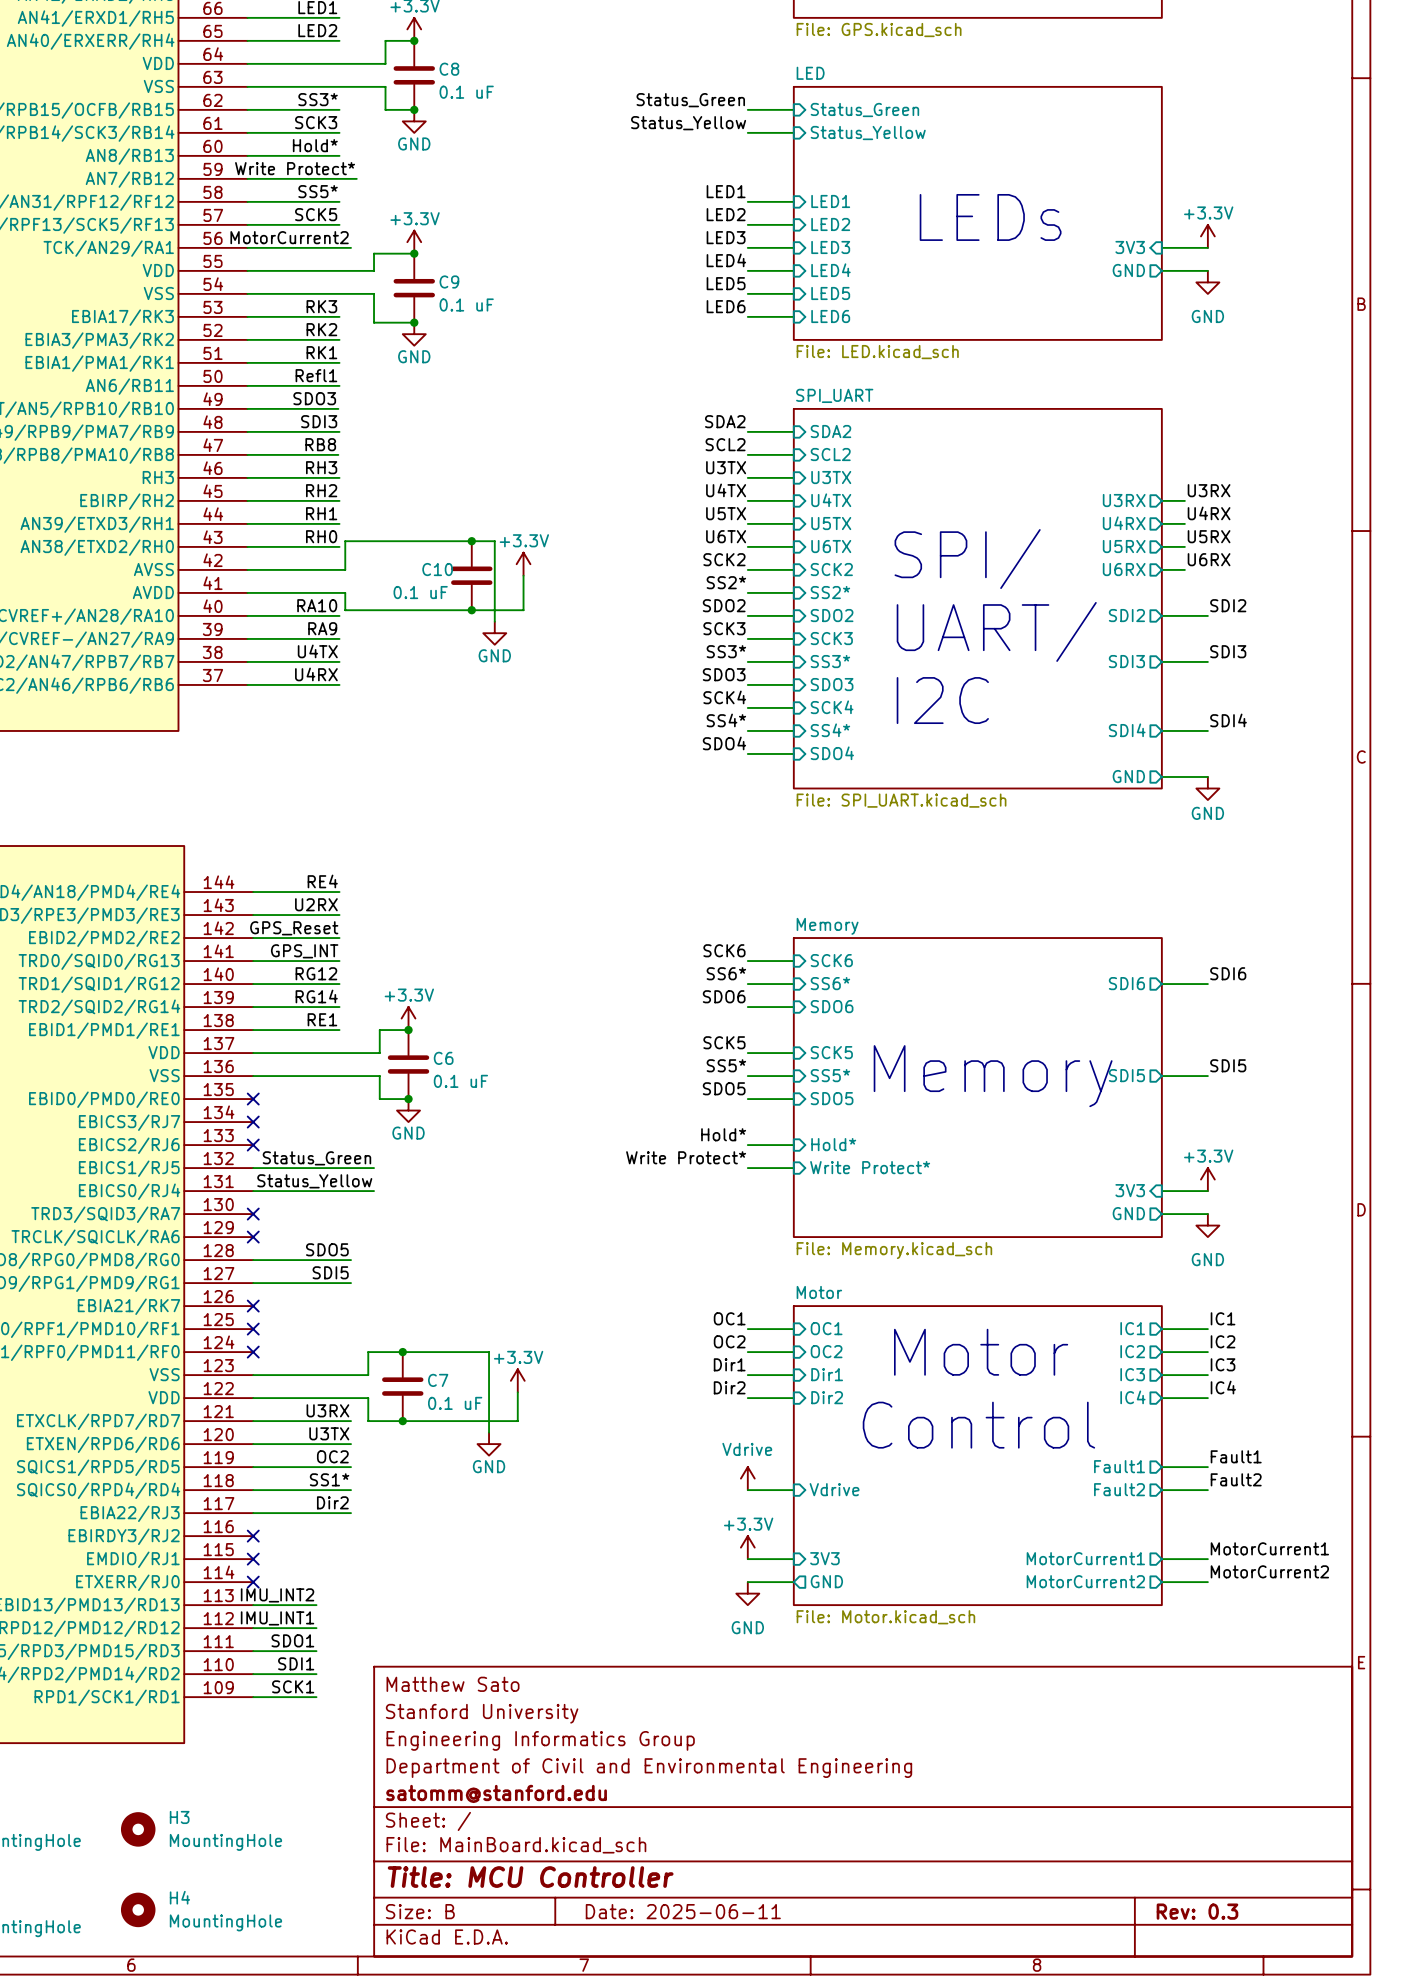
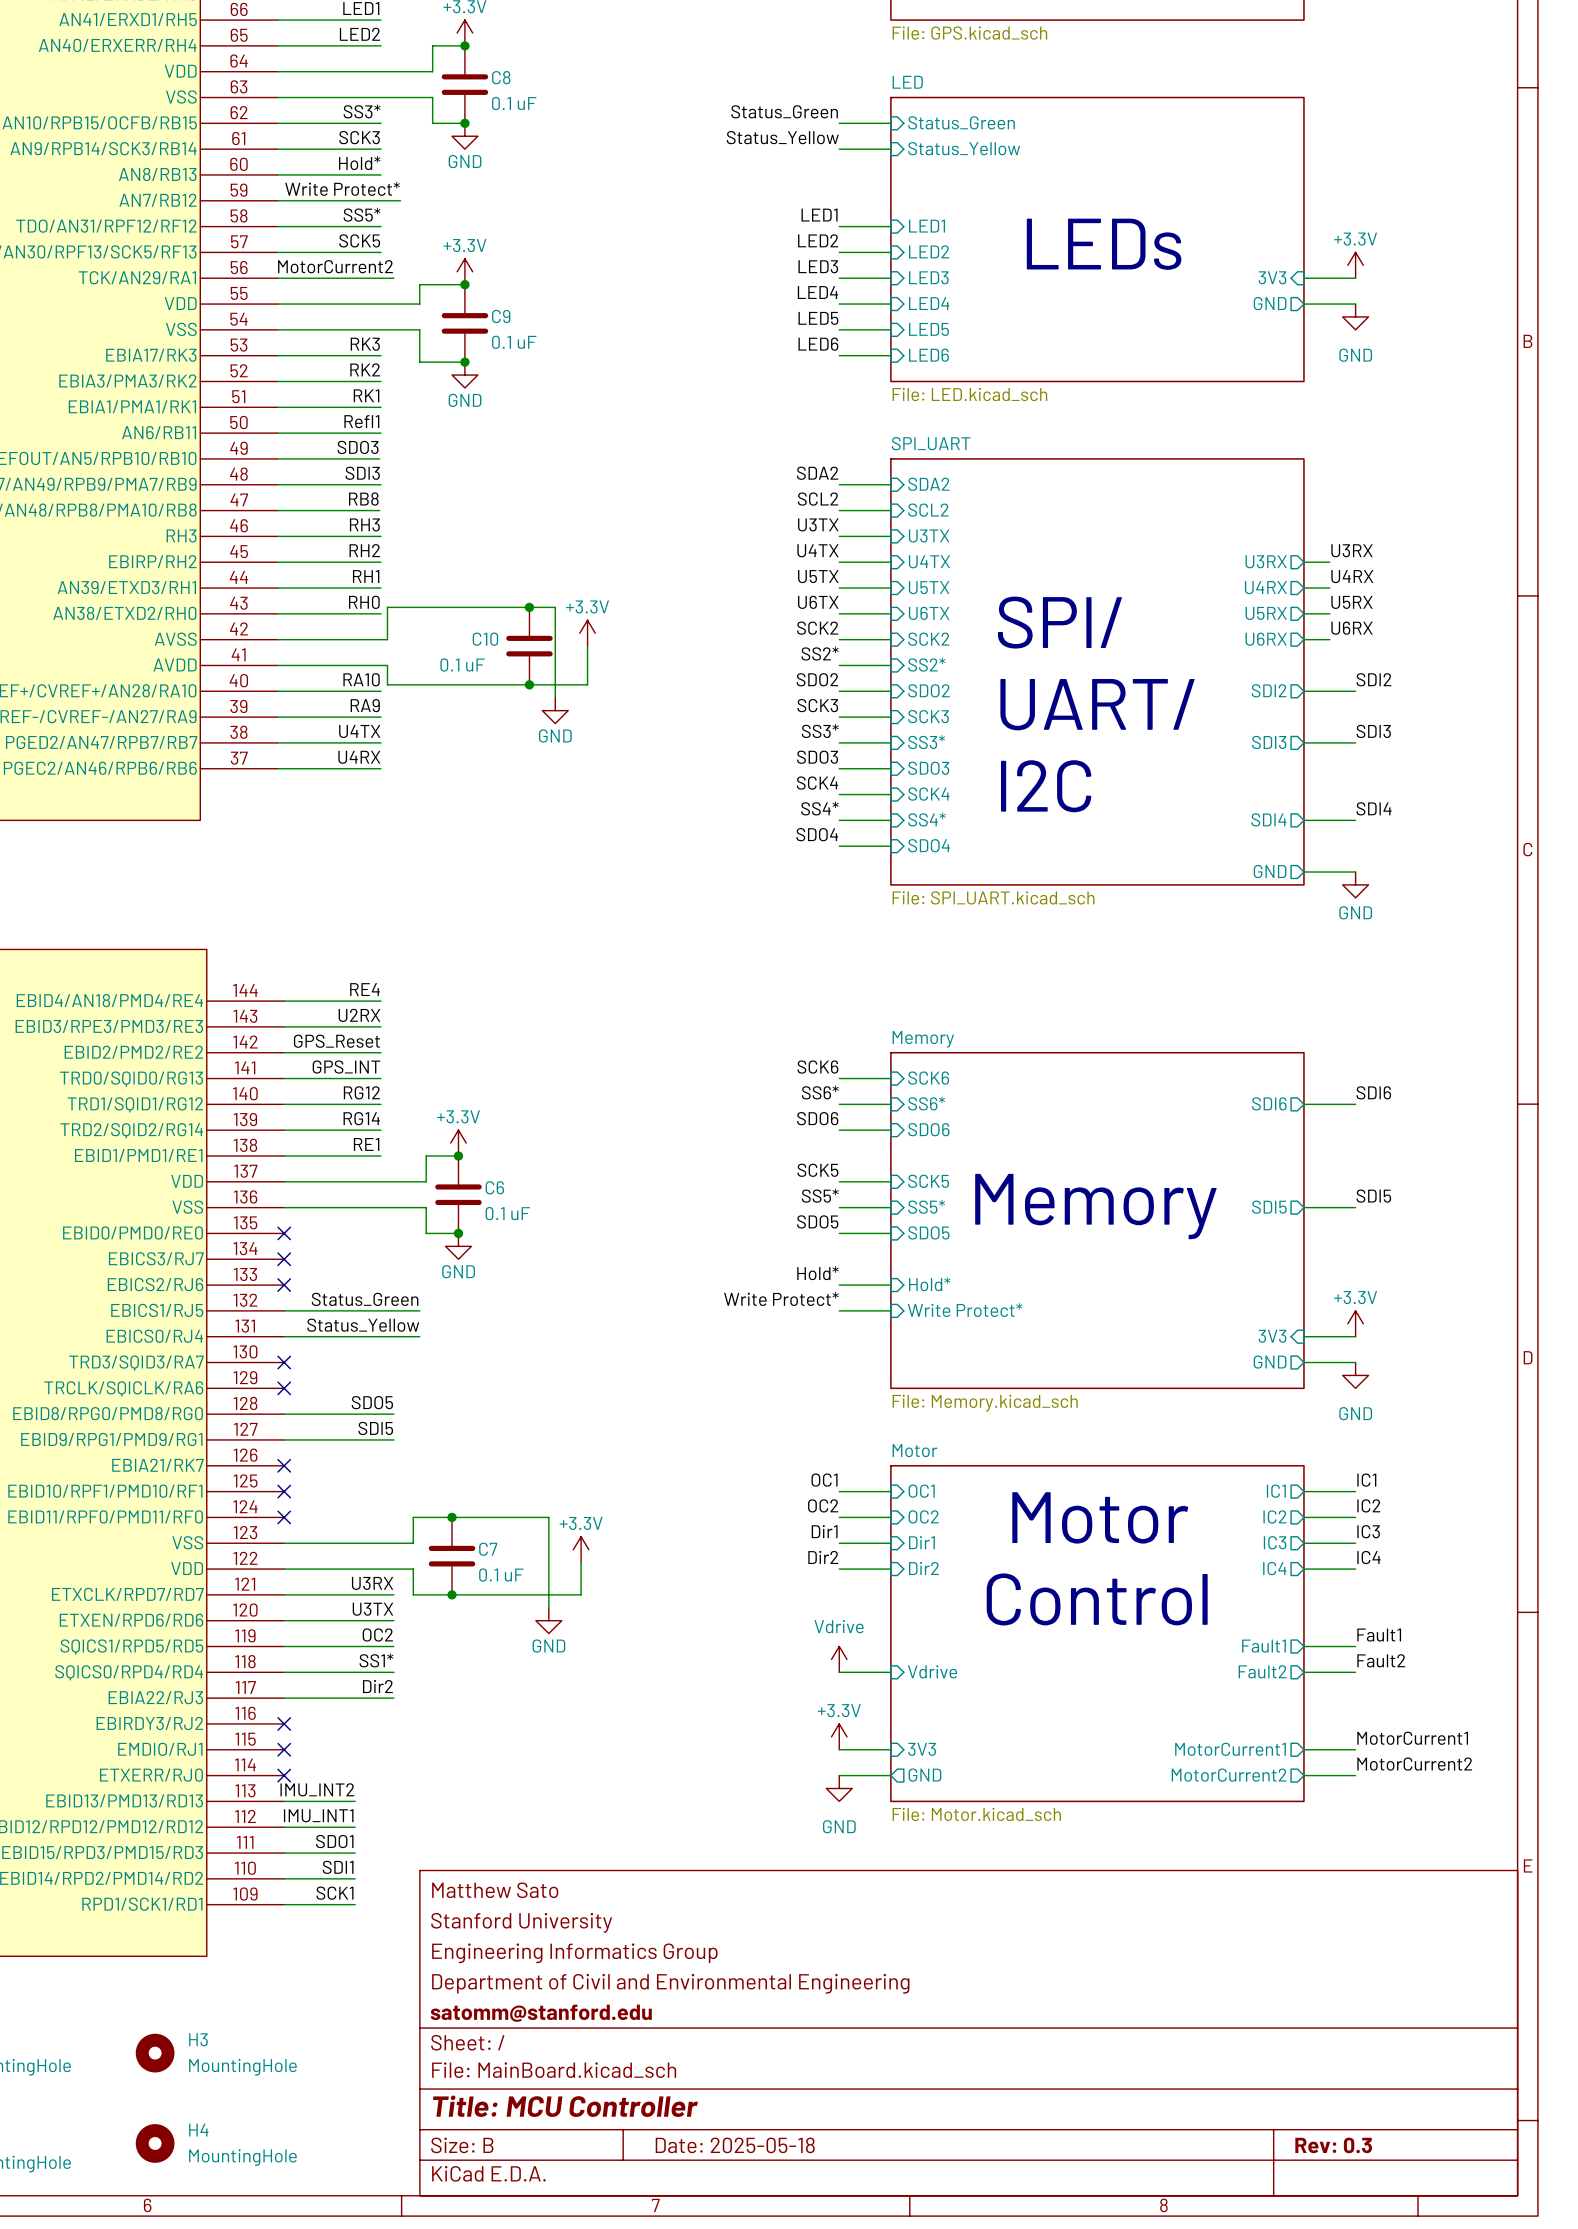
title block: Date: 2025-06-11 (683, 1911) -> Date: 2025-05-18 (735, 2145)

